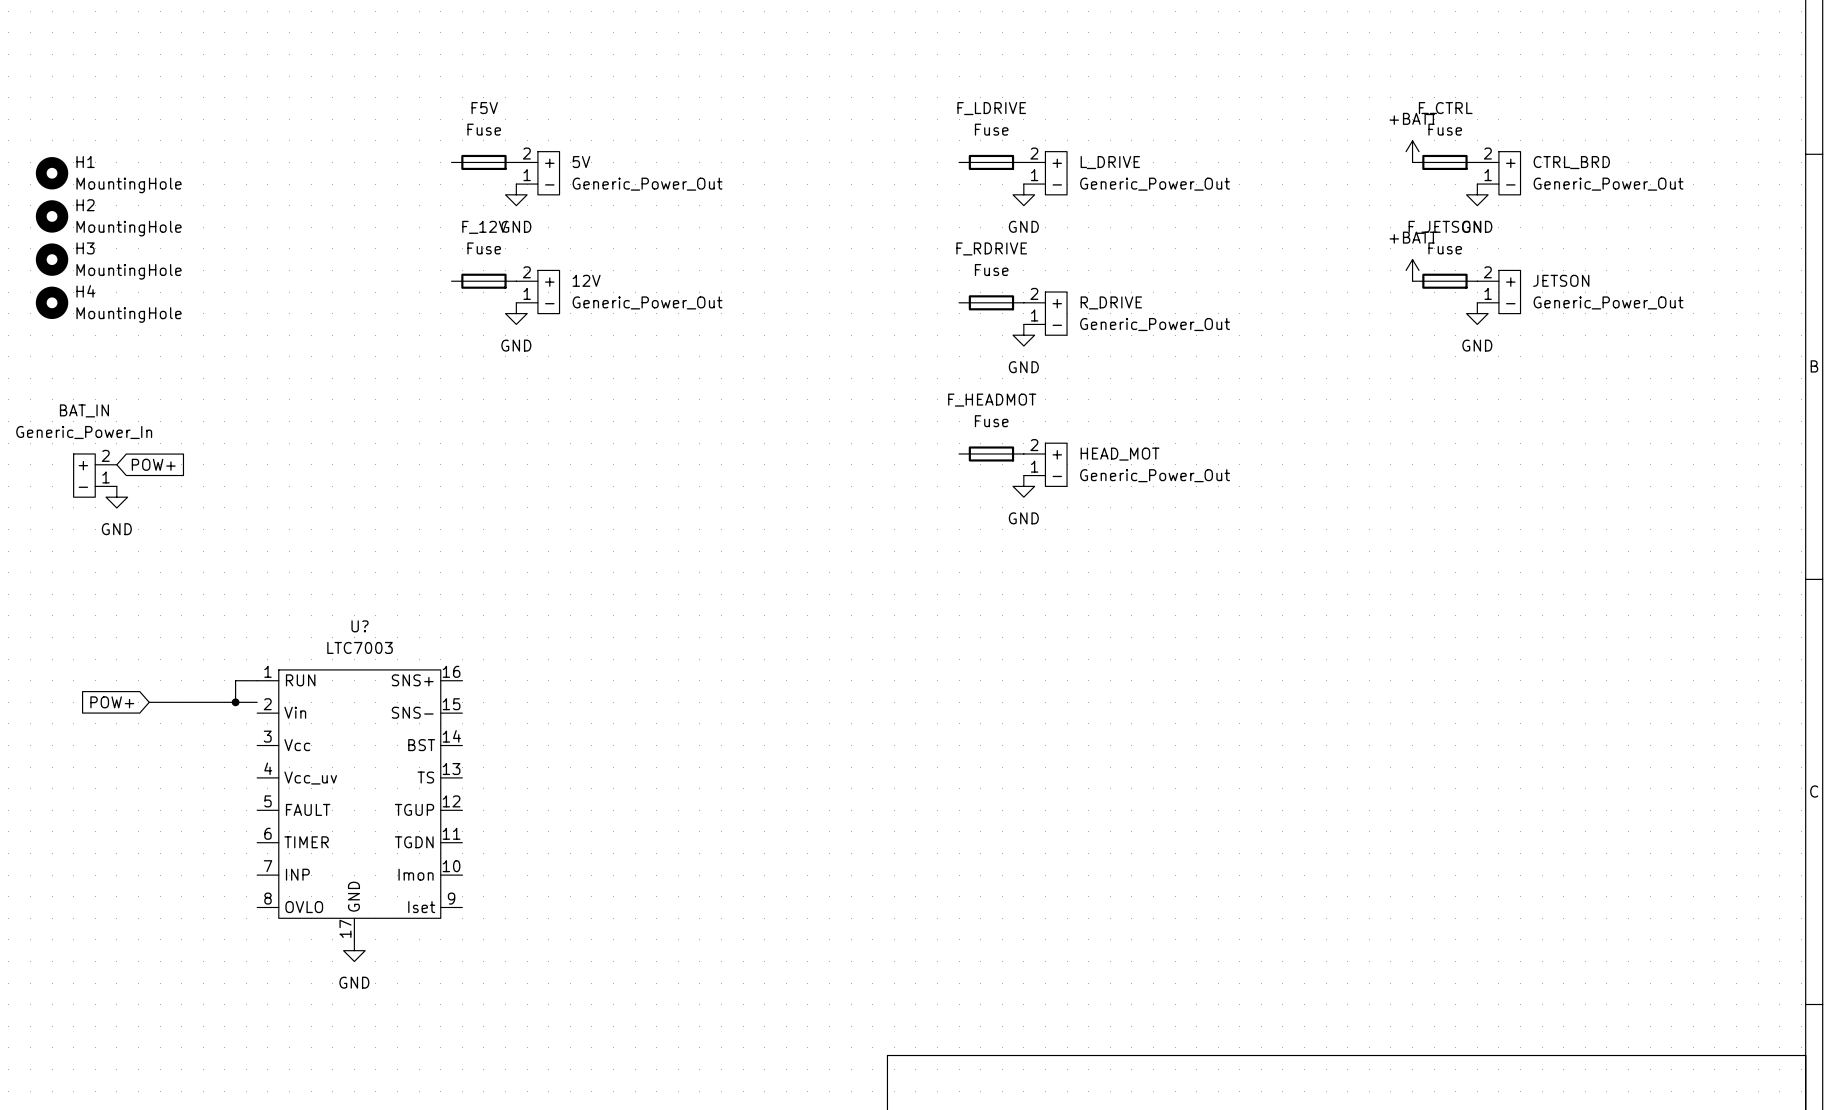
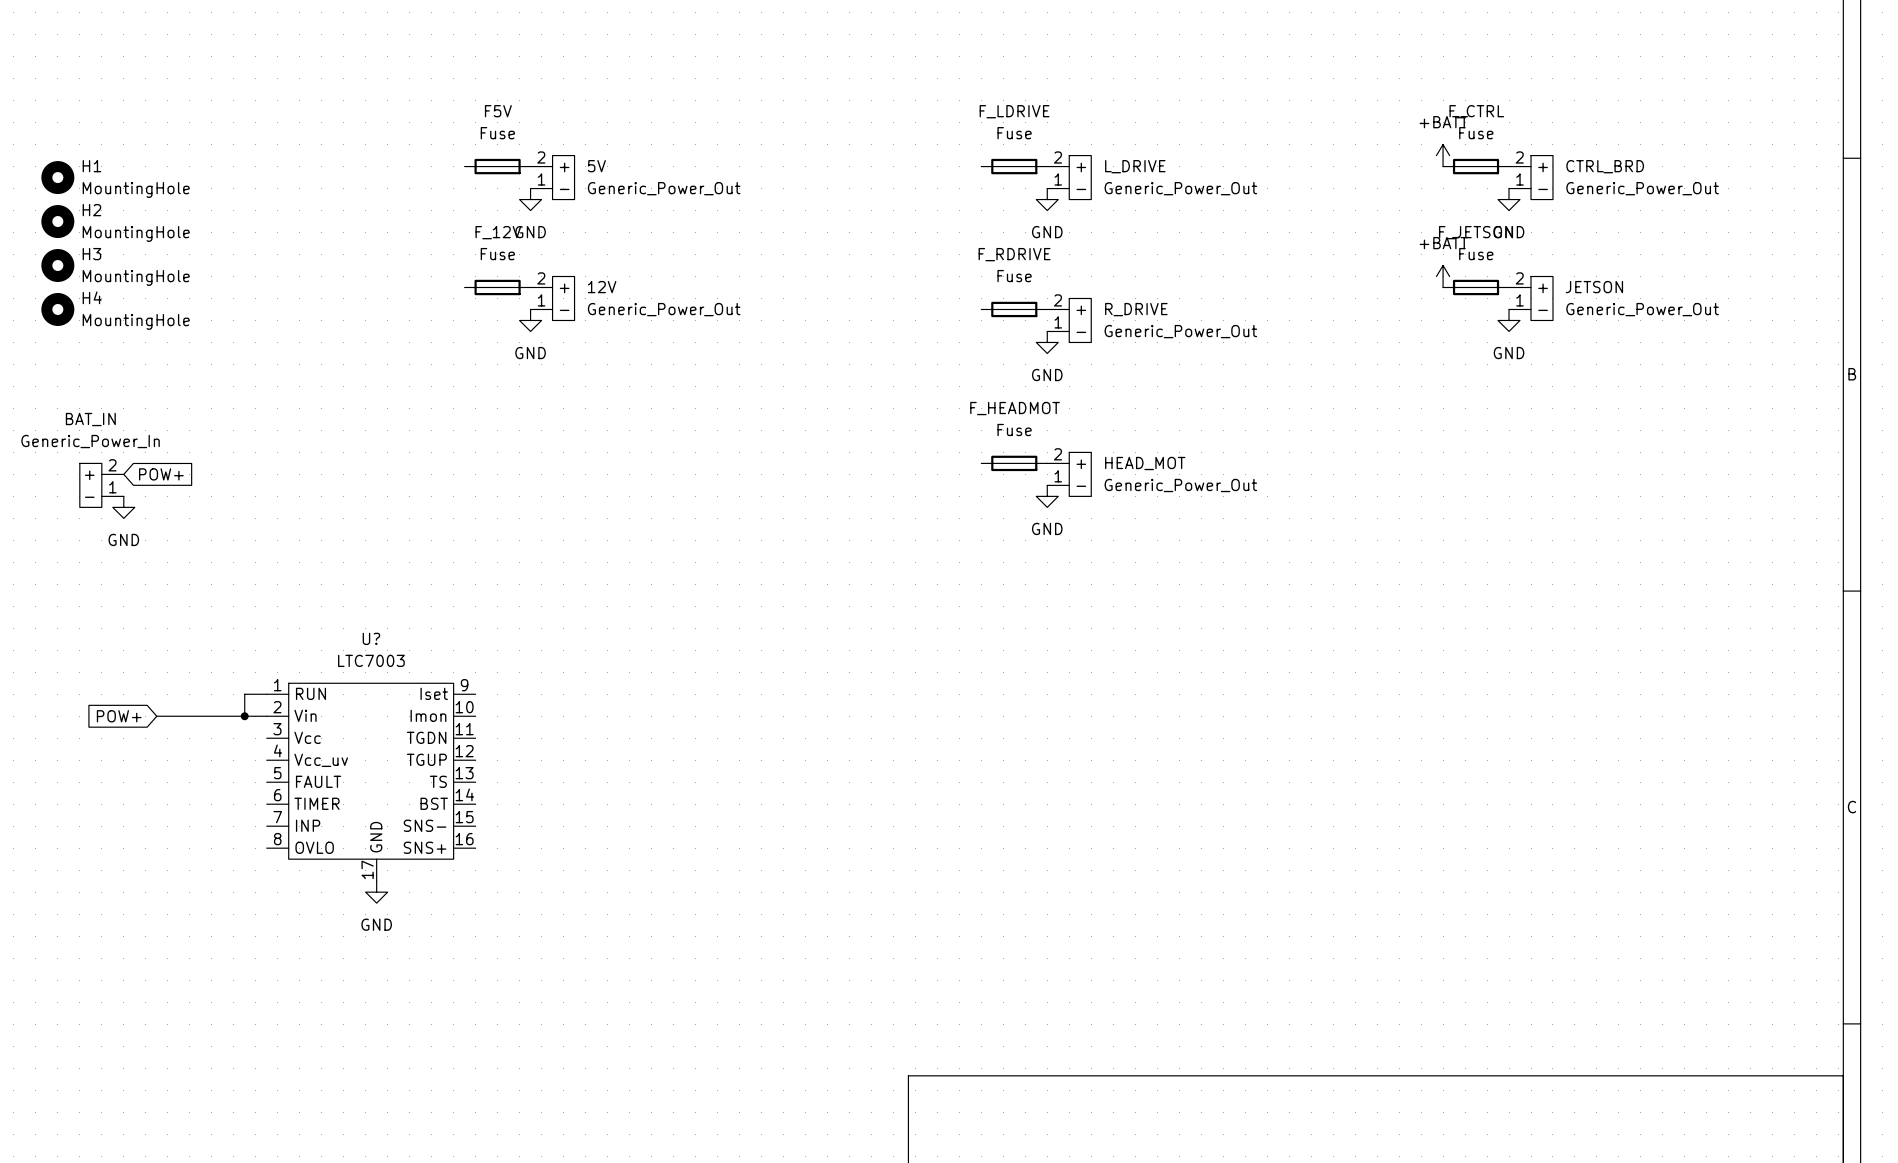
U?: none -> LTC7003 (371, 782)
U?: LTC7003 (359, 804) -> none
power symbol position: GND (354, 950) -> GND (376, 892)

